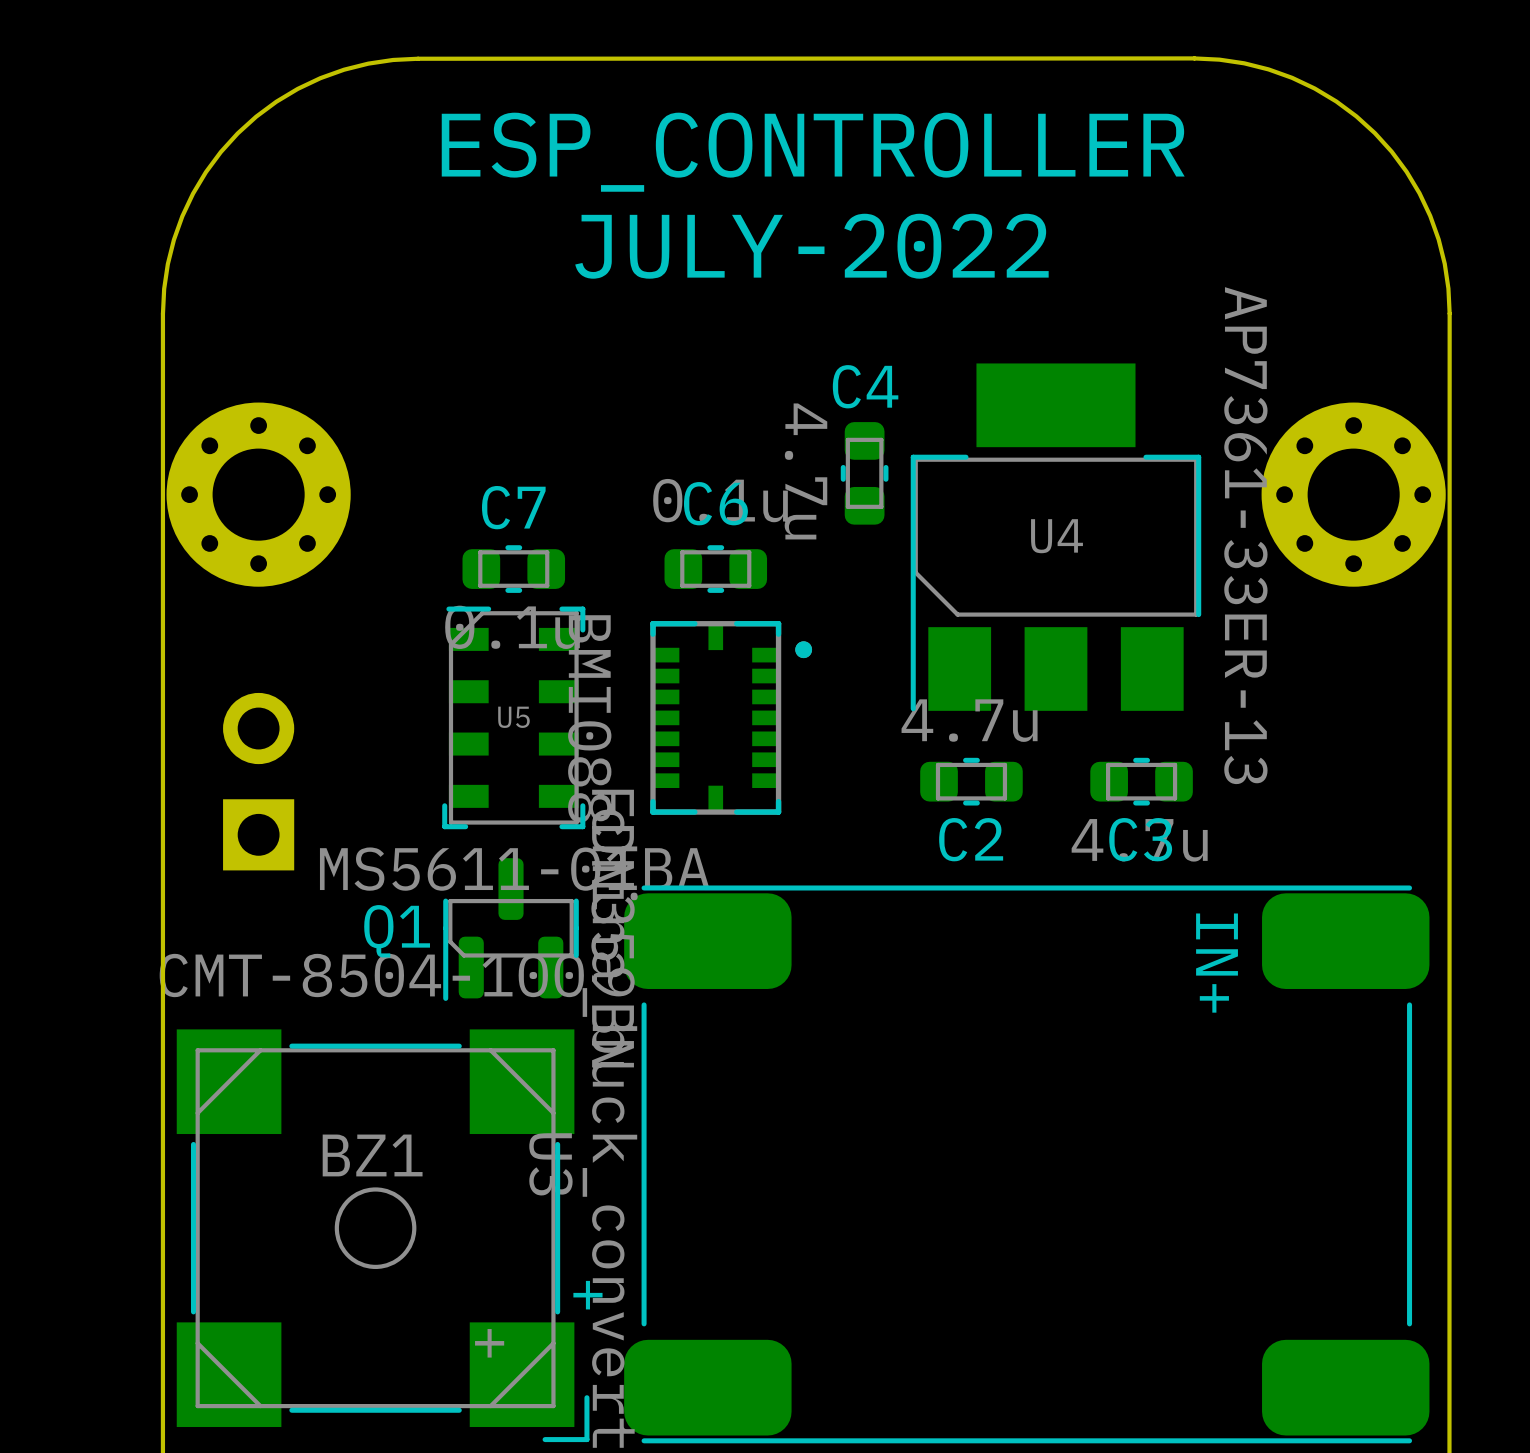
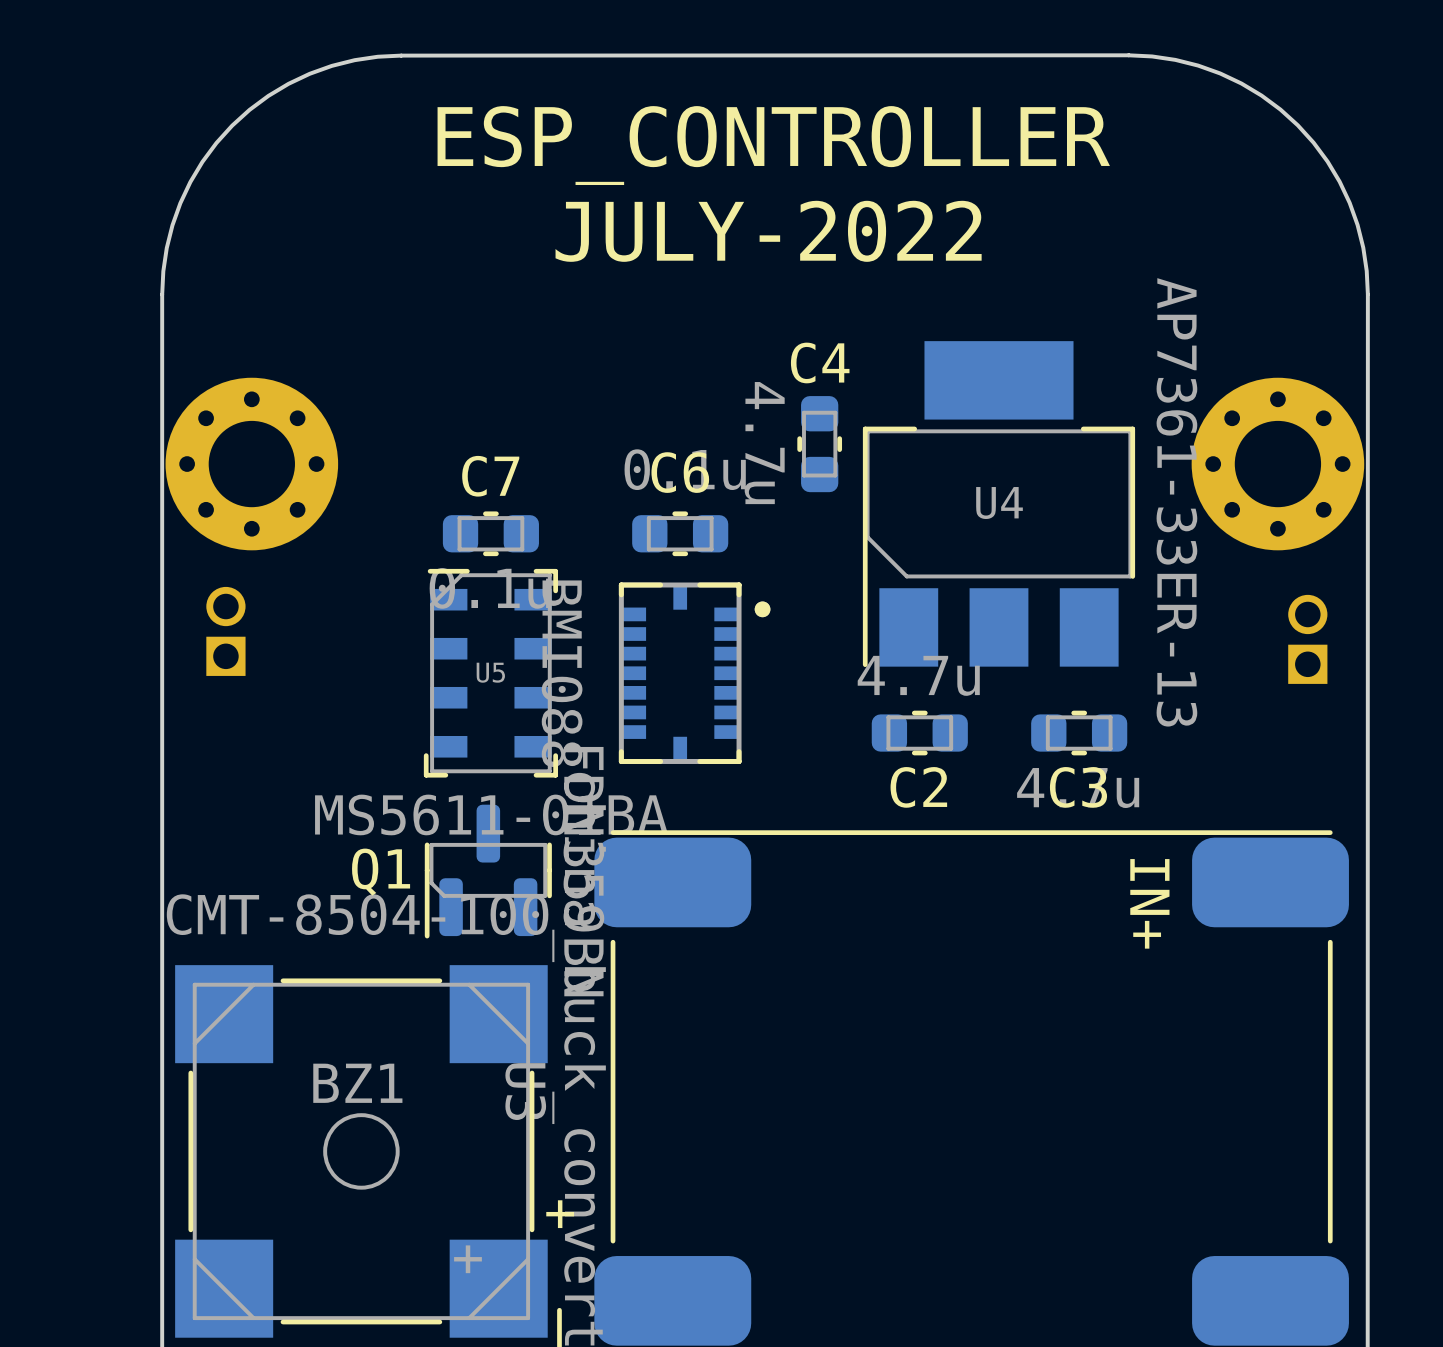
part: none -> (225, 631)
part: none -> (1307, 639)
part: (258, 781) -> none

